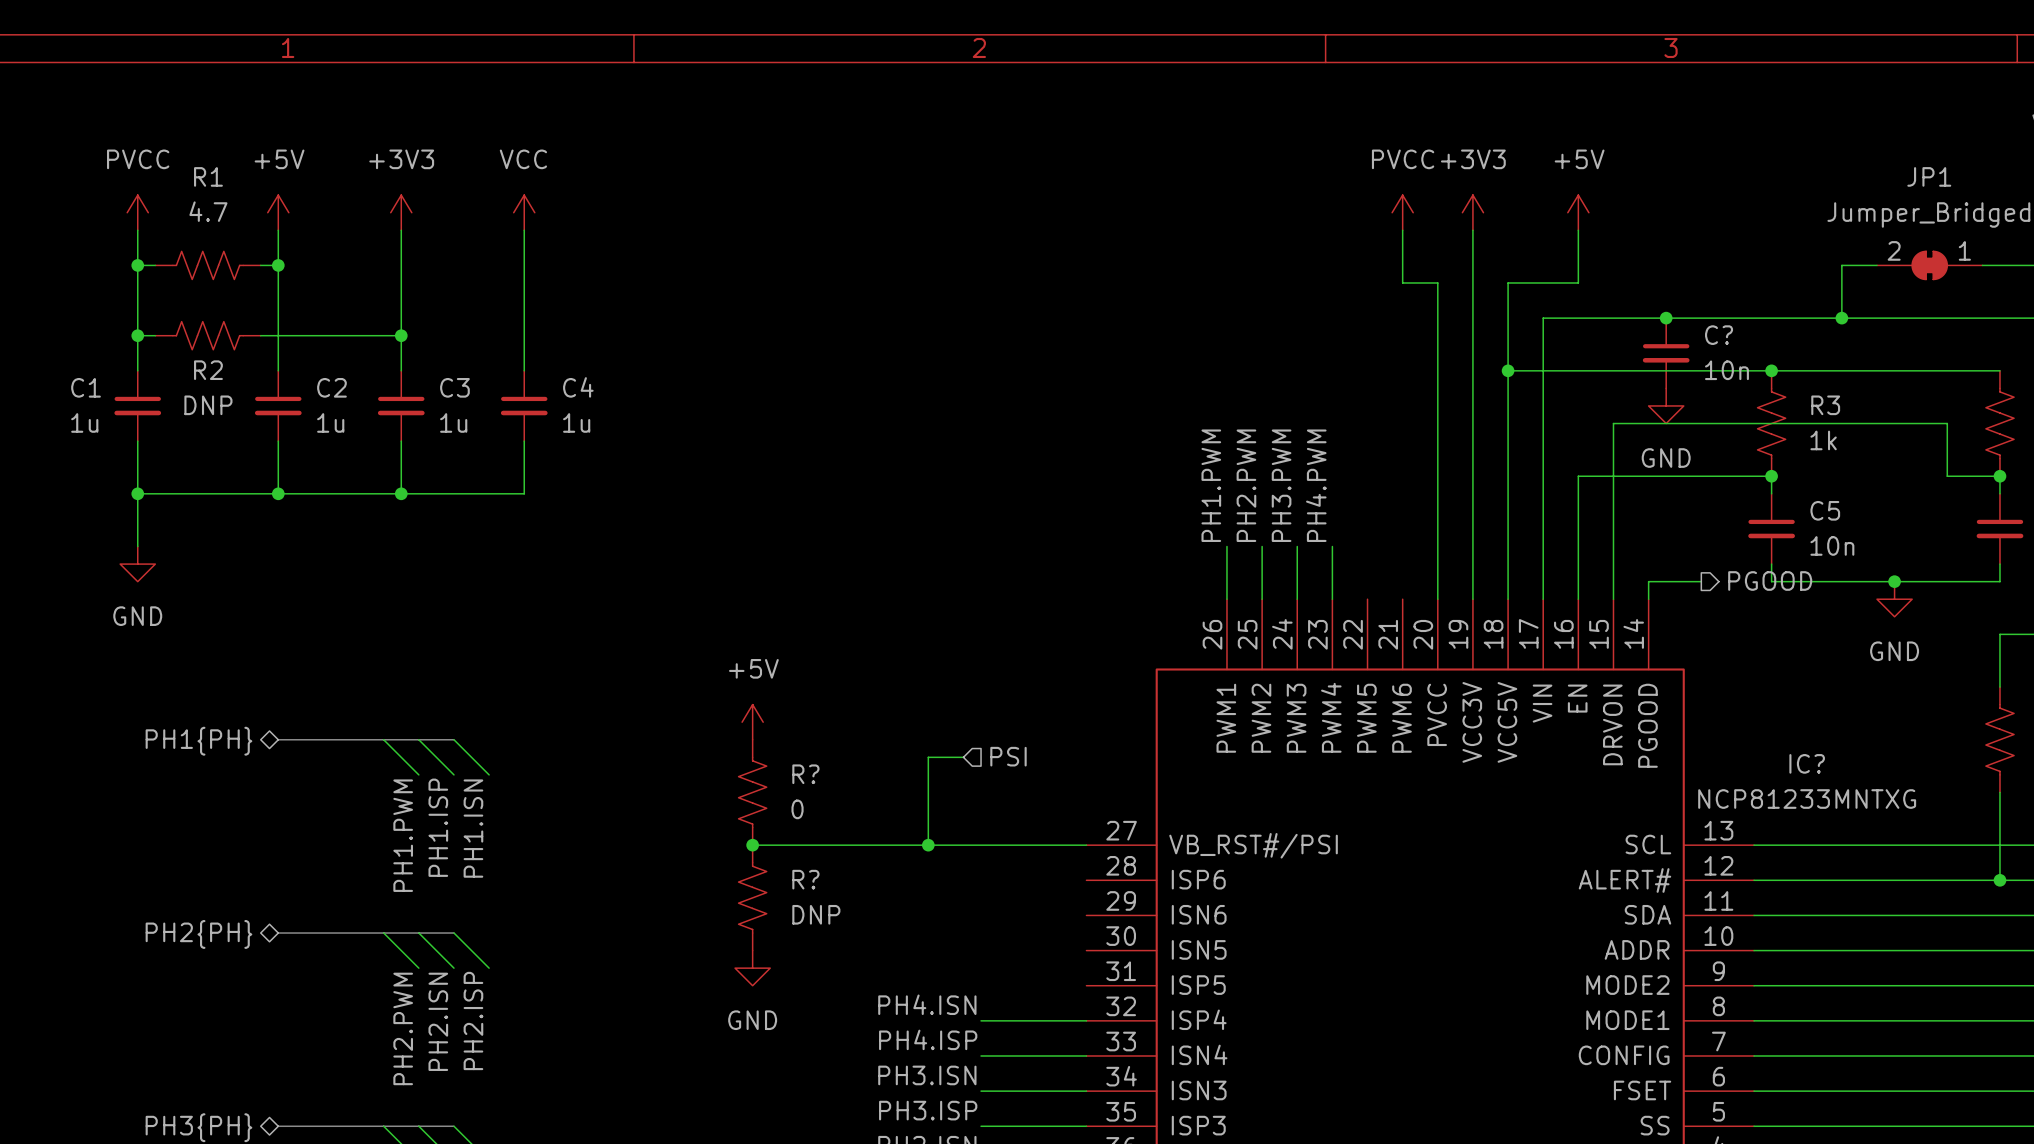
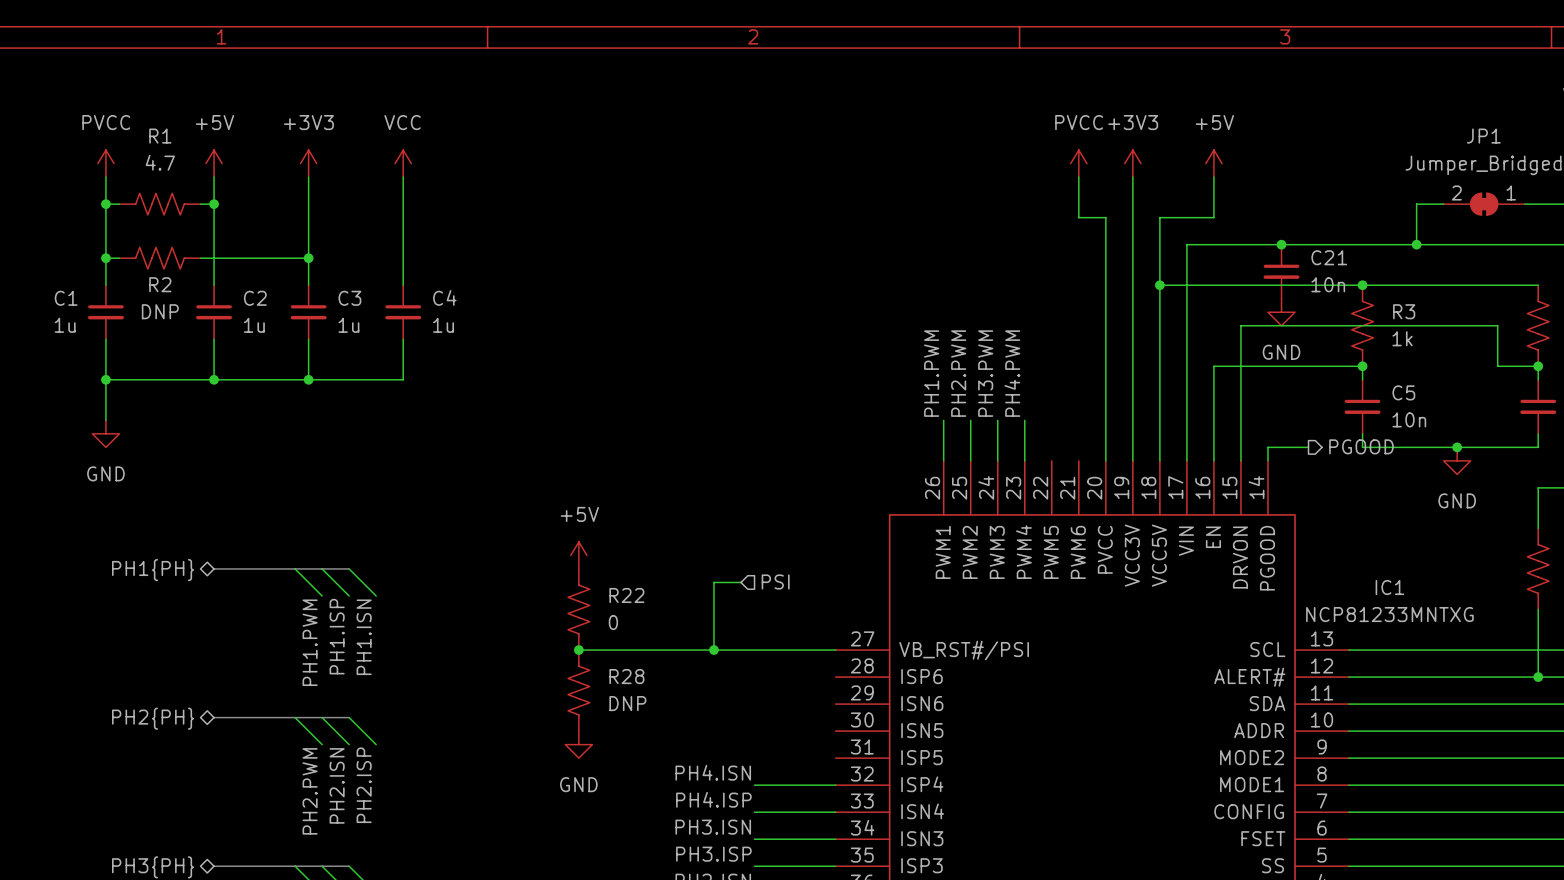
C? name: C? (1719, 335) -> C21 (1329, 257)
IC? name: IC? (1807, 763) -> IC1 (1389, 587)
R? name: R? (805, 774) -> R22 (626, 595)
R? name: R? (805, 879) -> R28 (626, 676)

